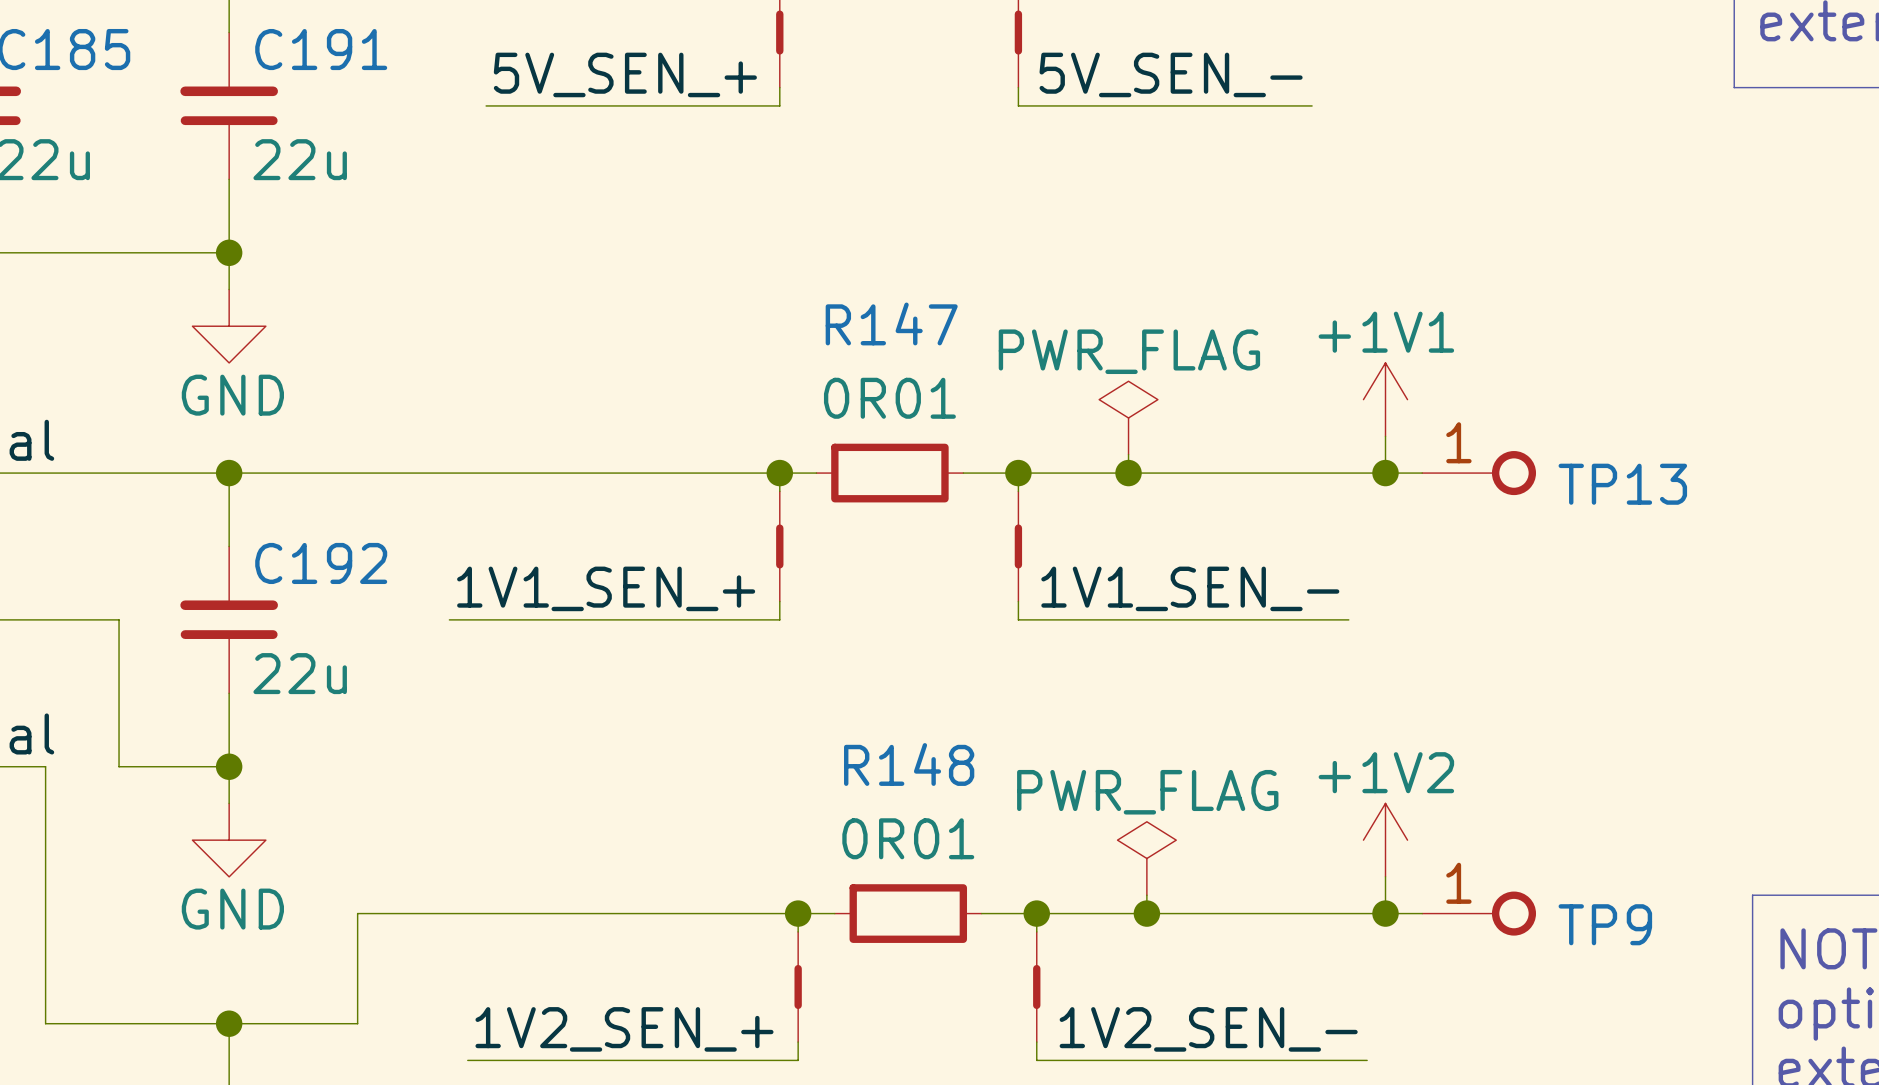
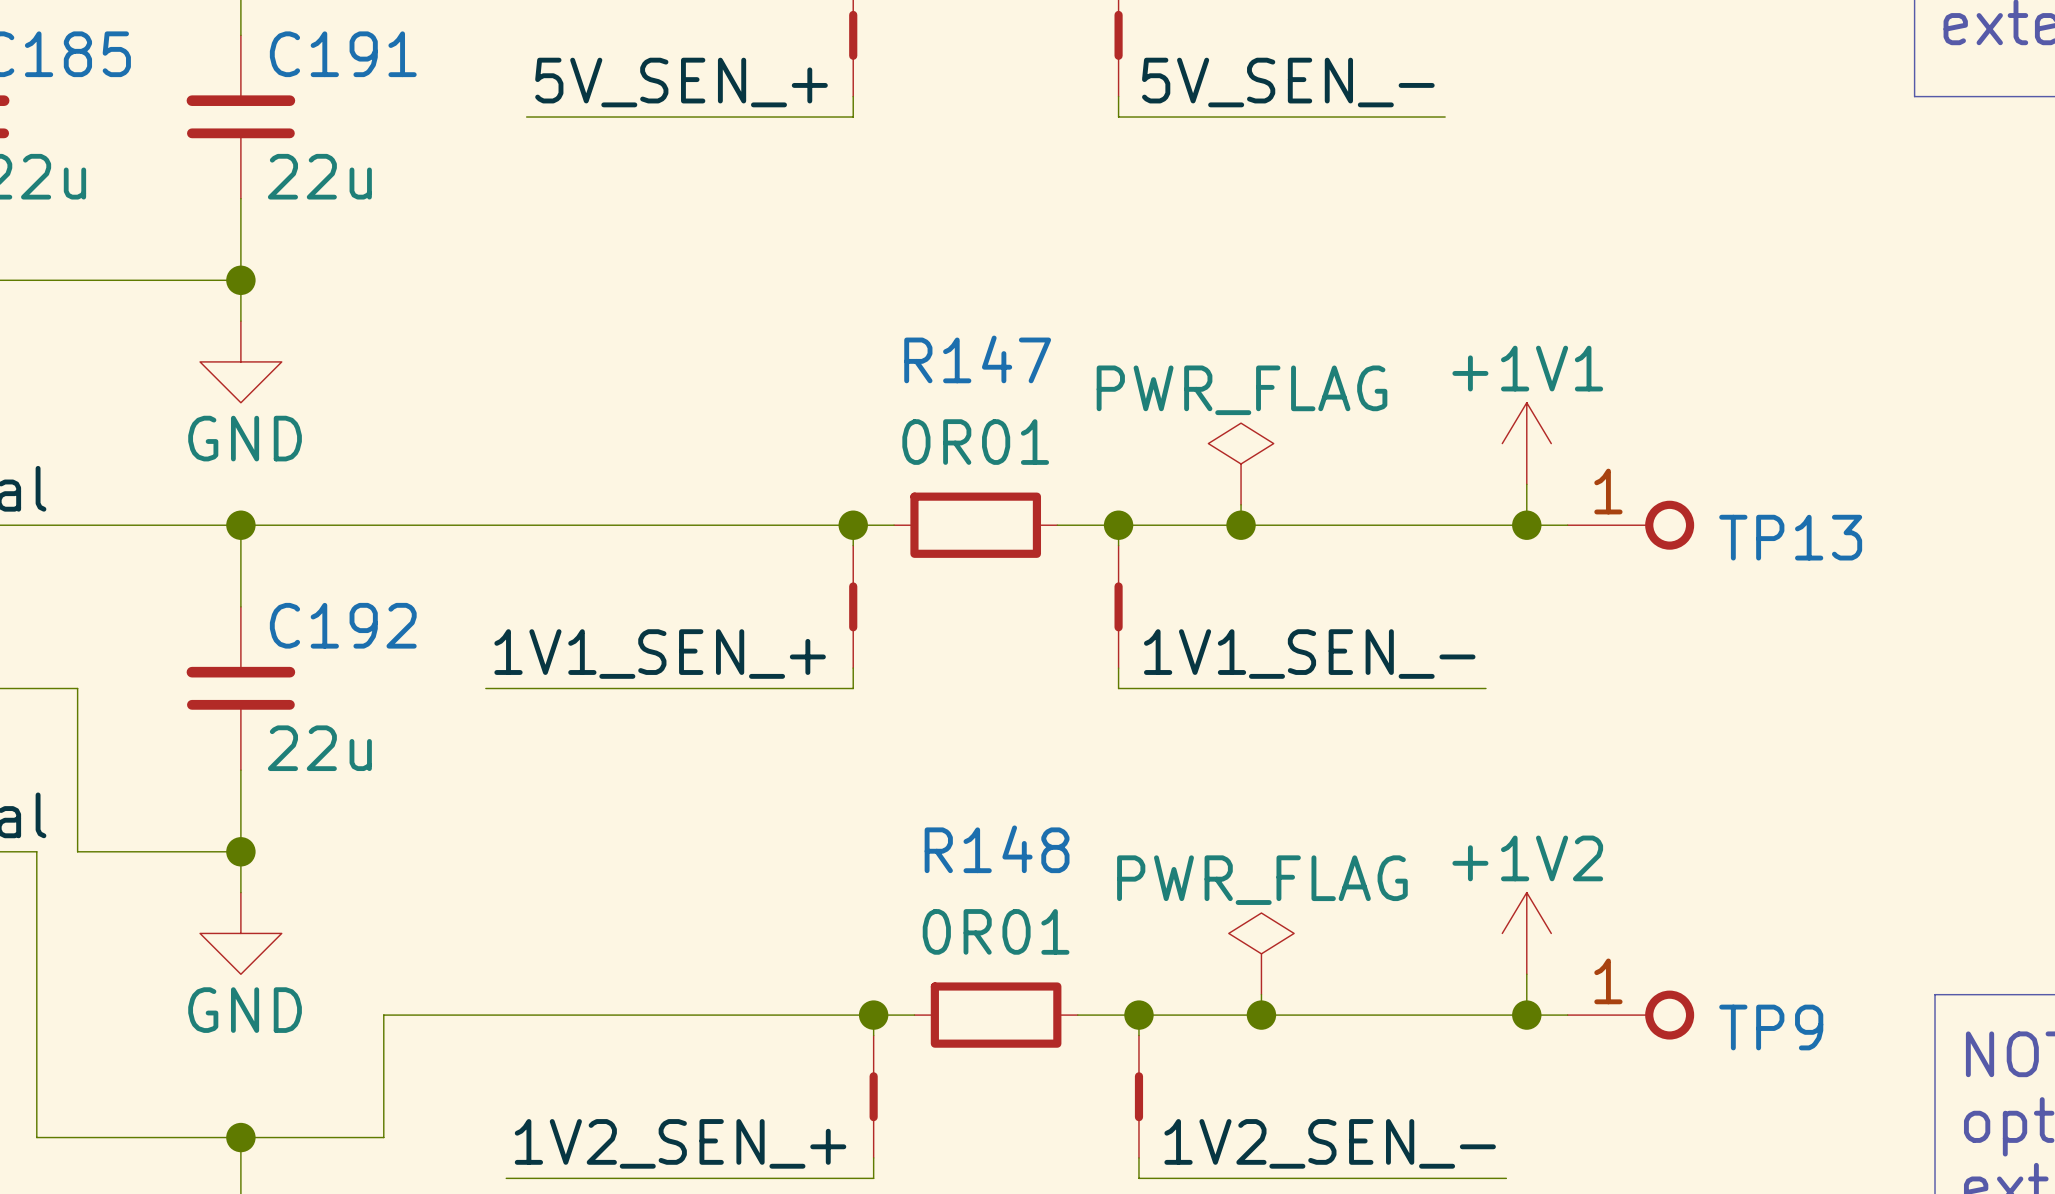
wire: (82, 619) (119, 619) (119, 766) -> (77, 688) (77, 851) (118, 851)

